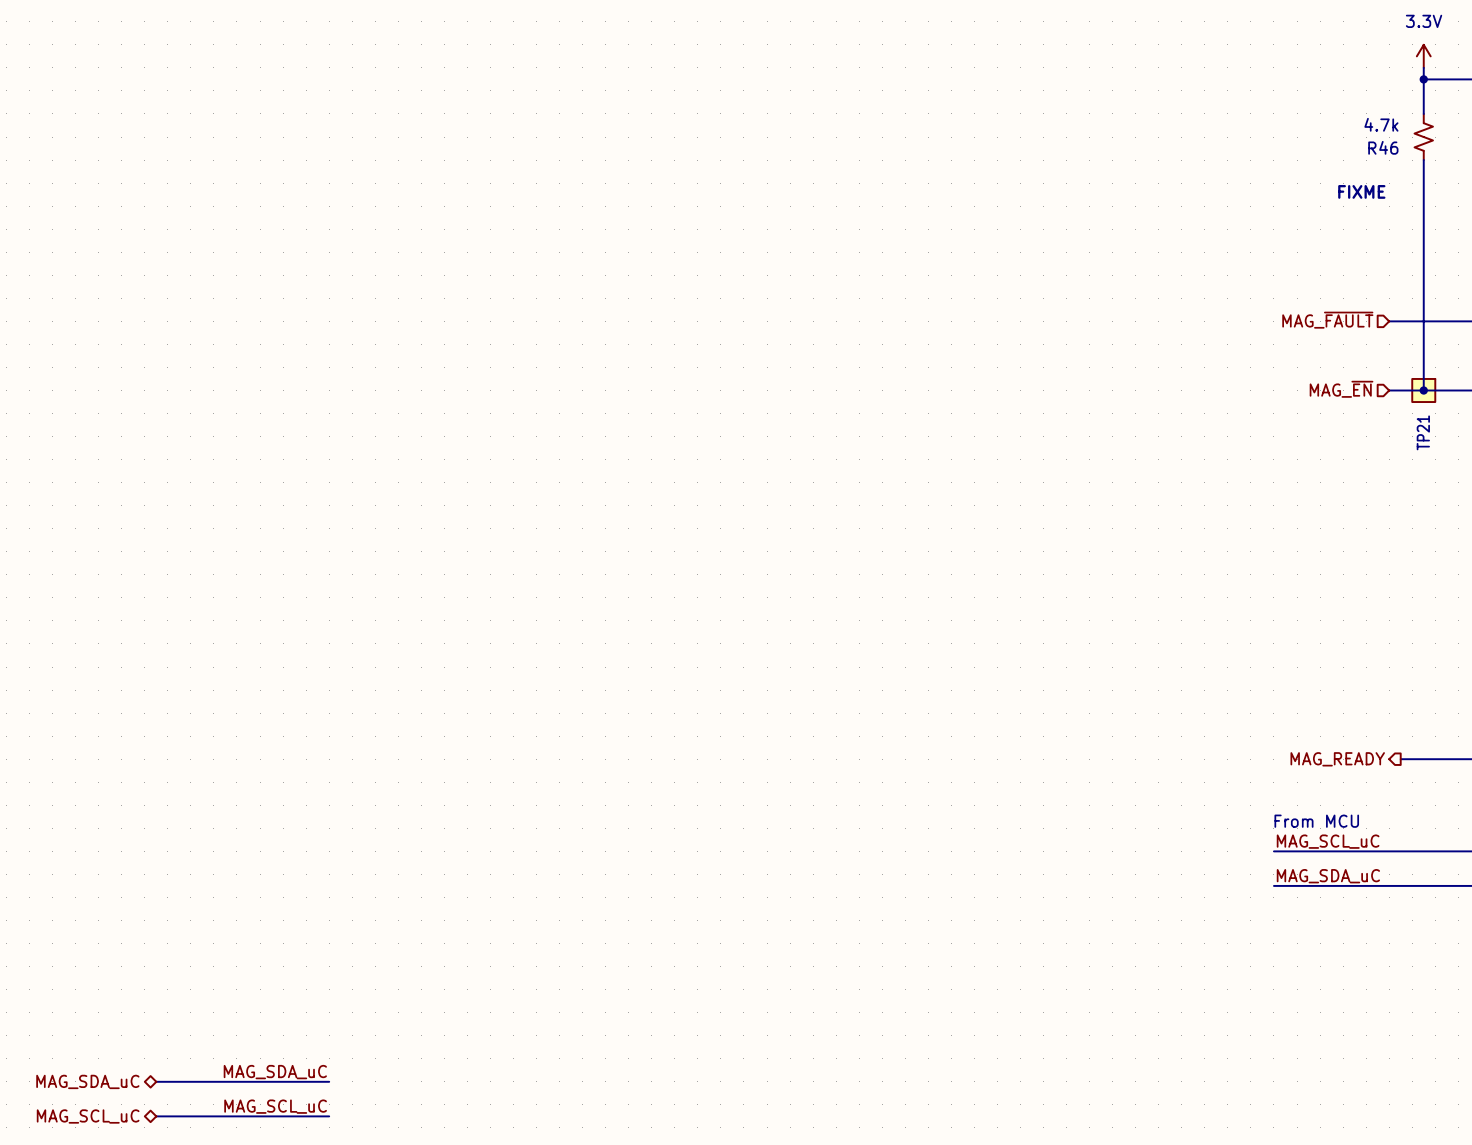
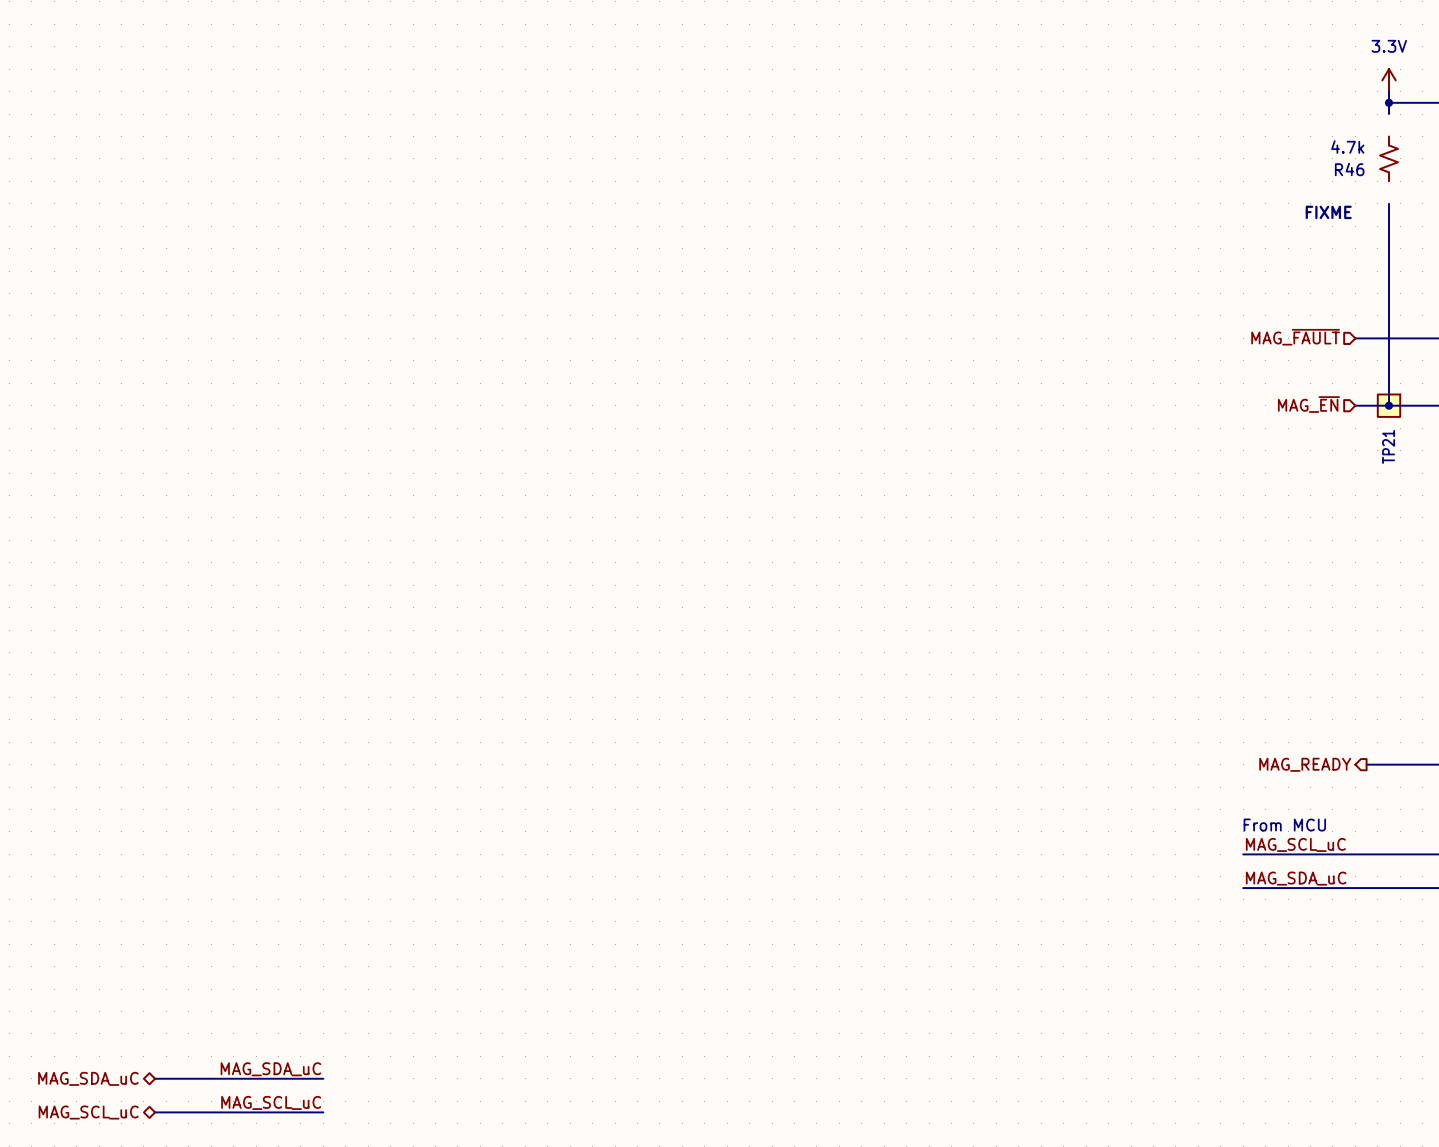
wire: (1423, 90) (1423, 113) -> none
wire: (1423, 160) (1423, 183) -> none

